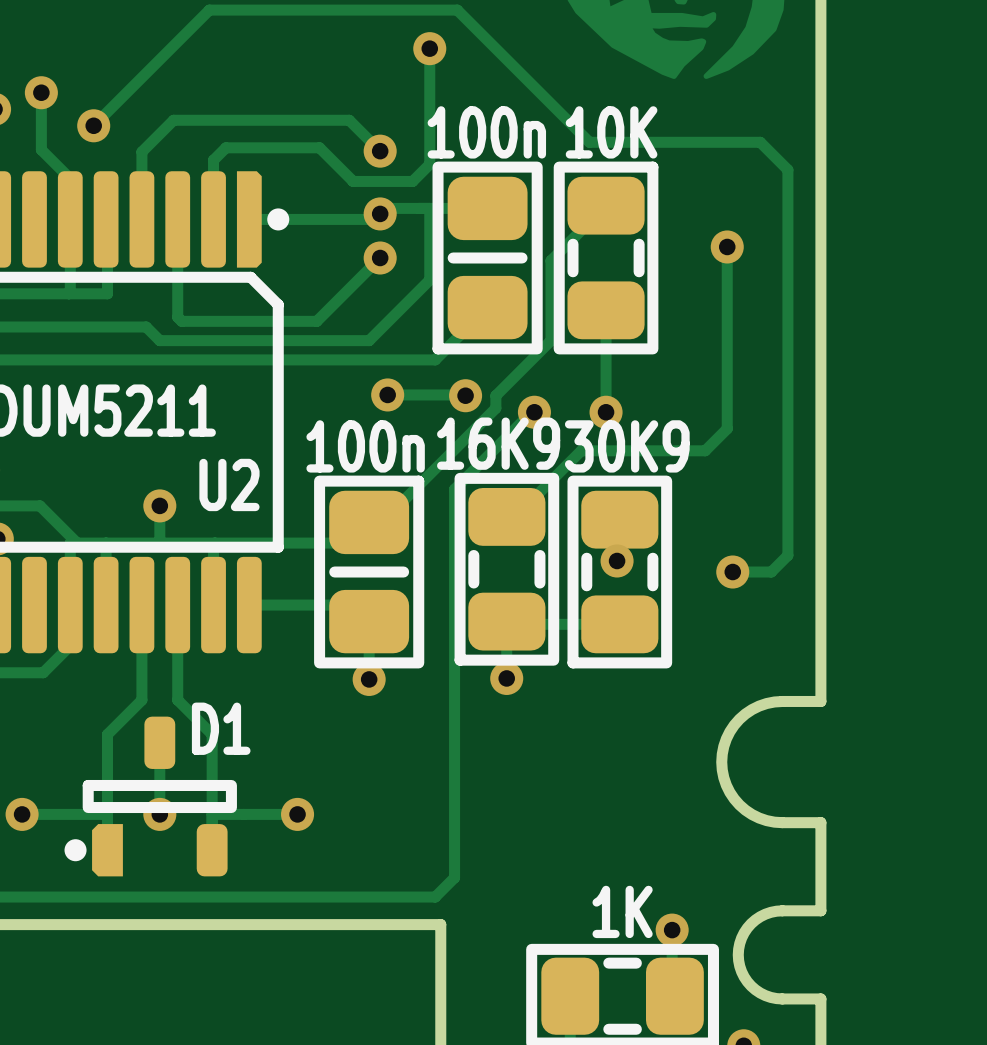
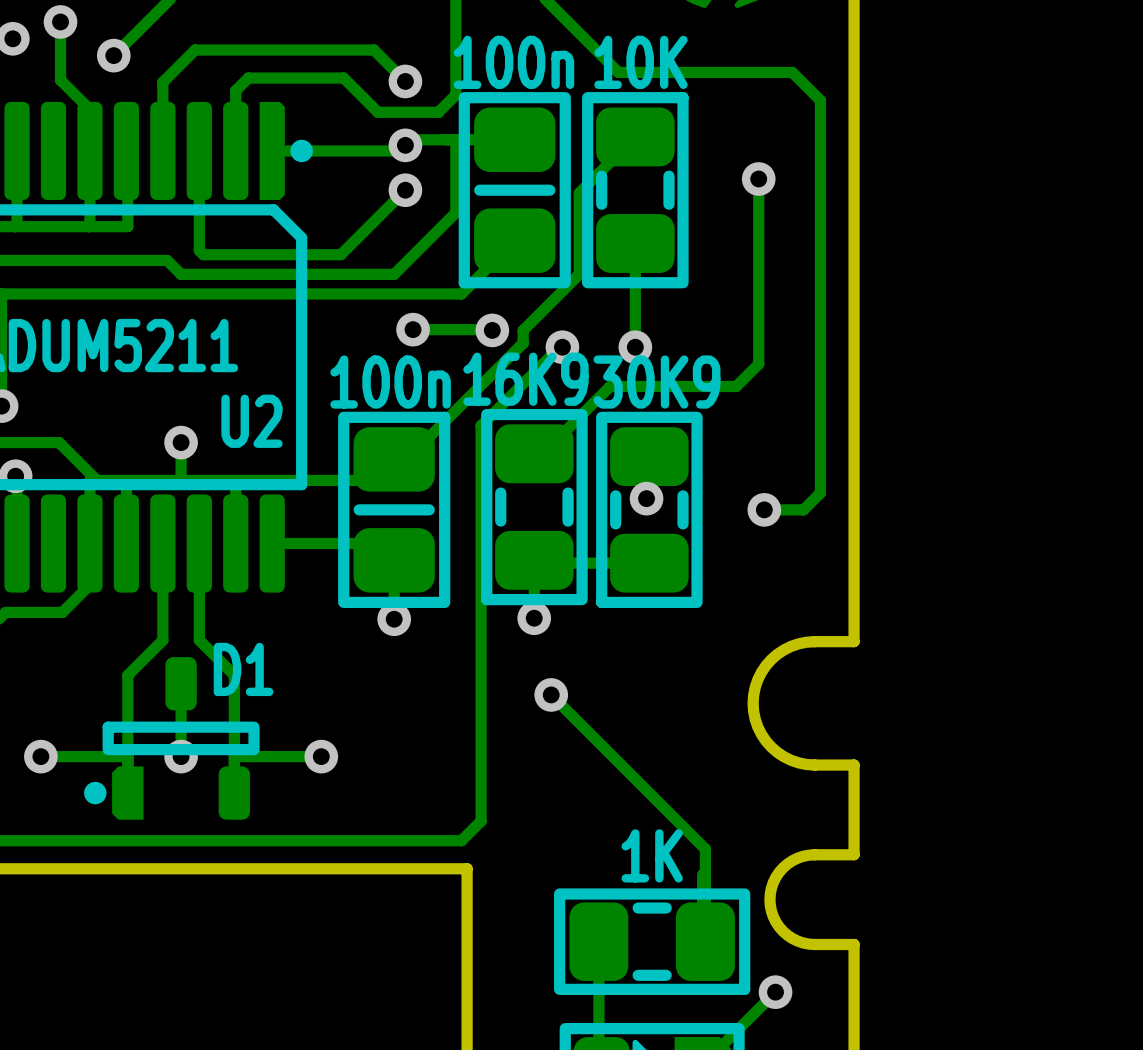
track: none -> (551, 694) (705, 849) (705, 941)
via position: (672, 930) -> (551, 694)

